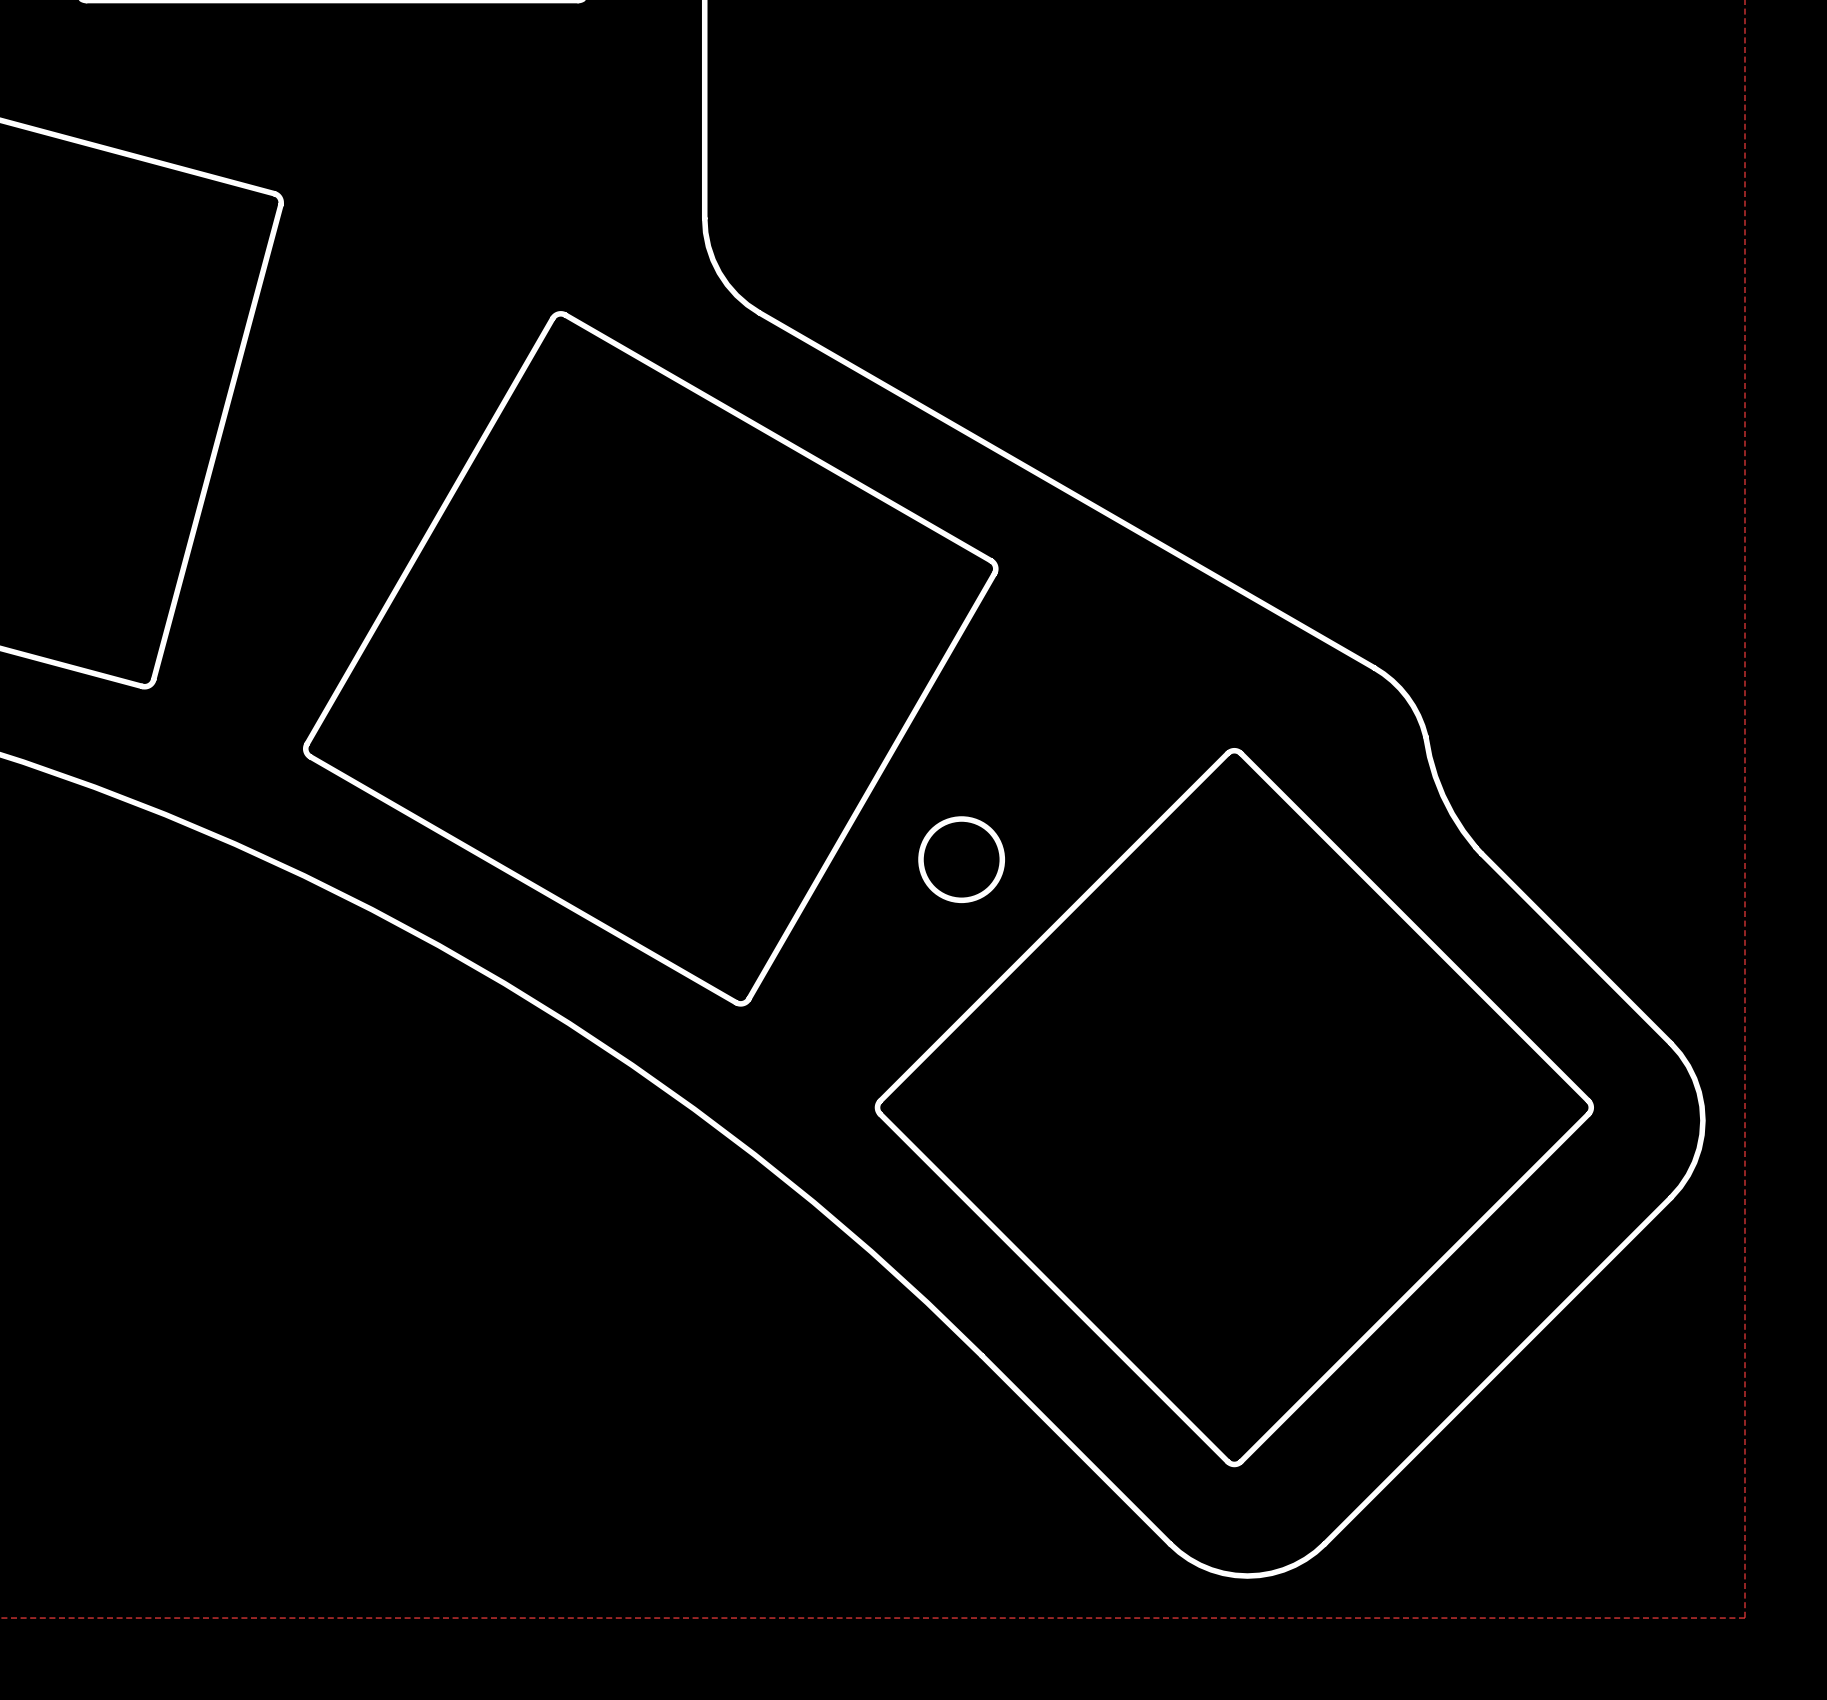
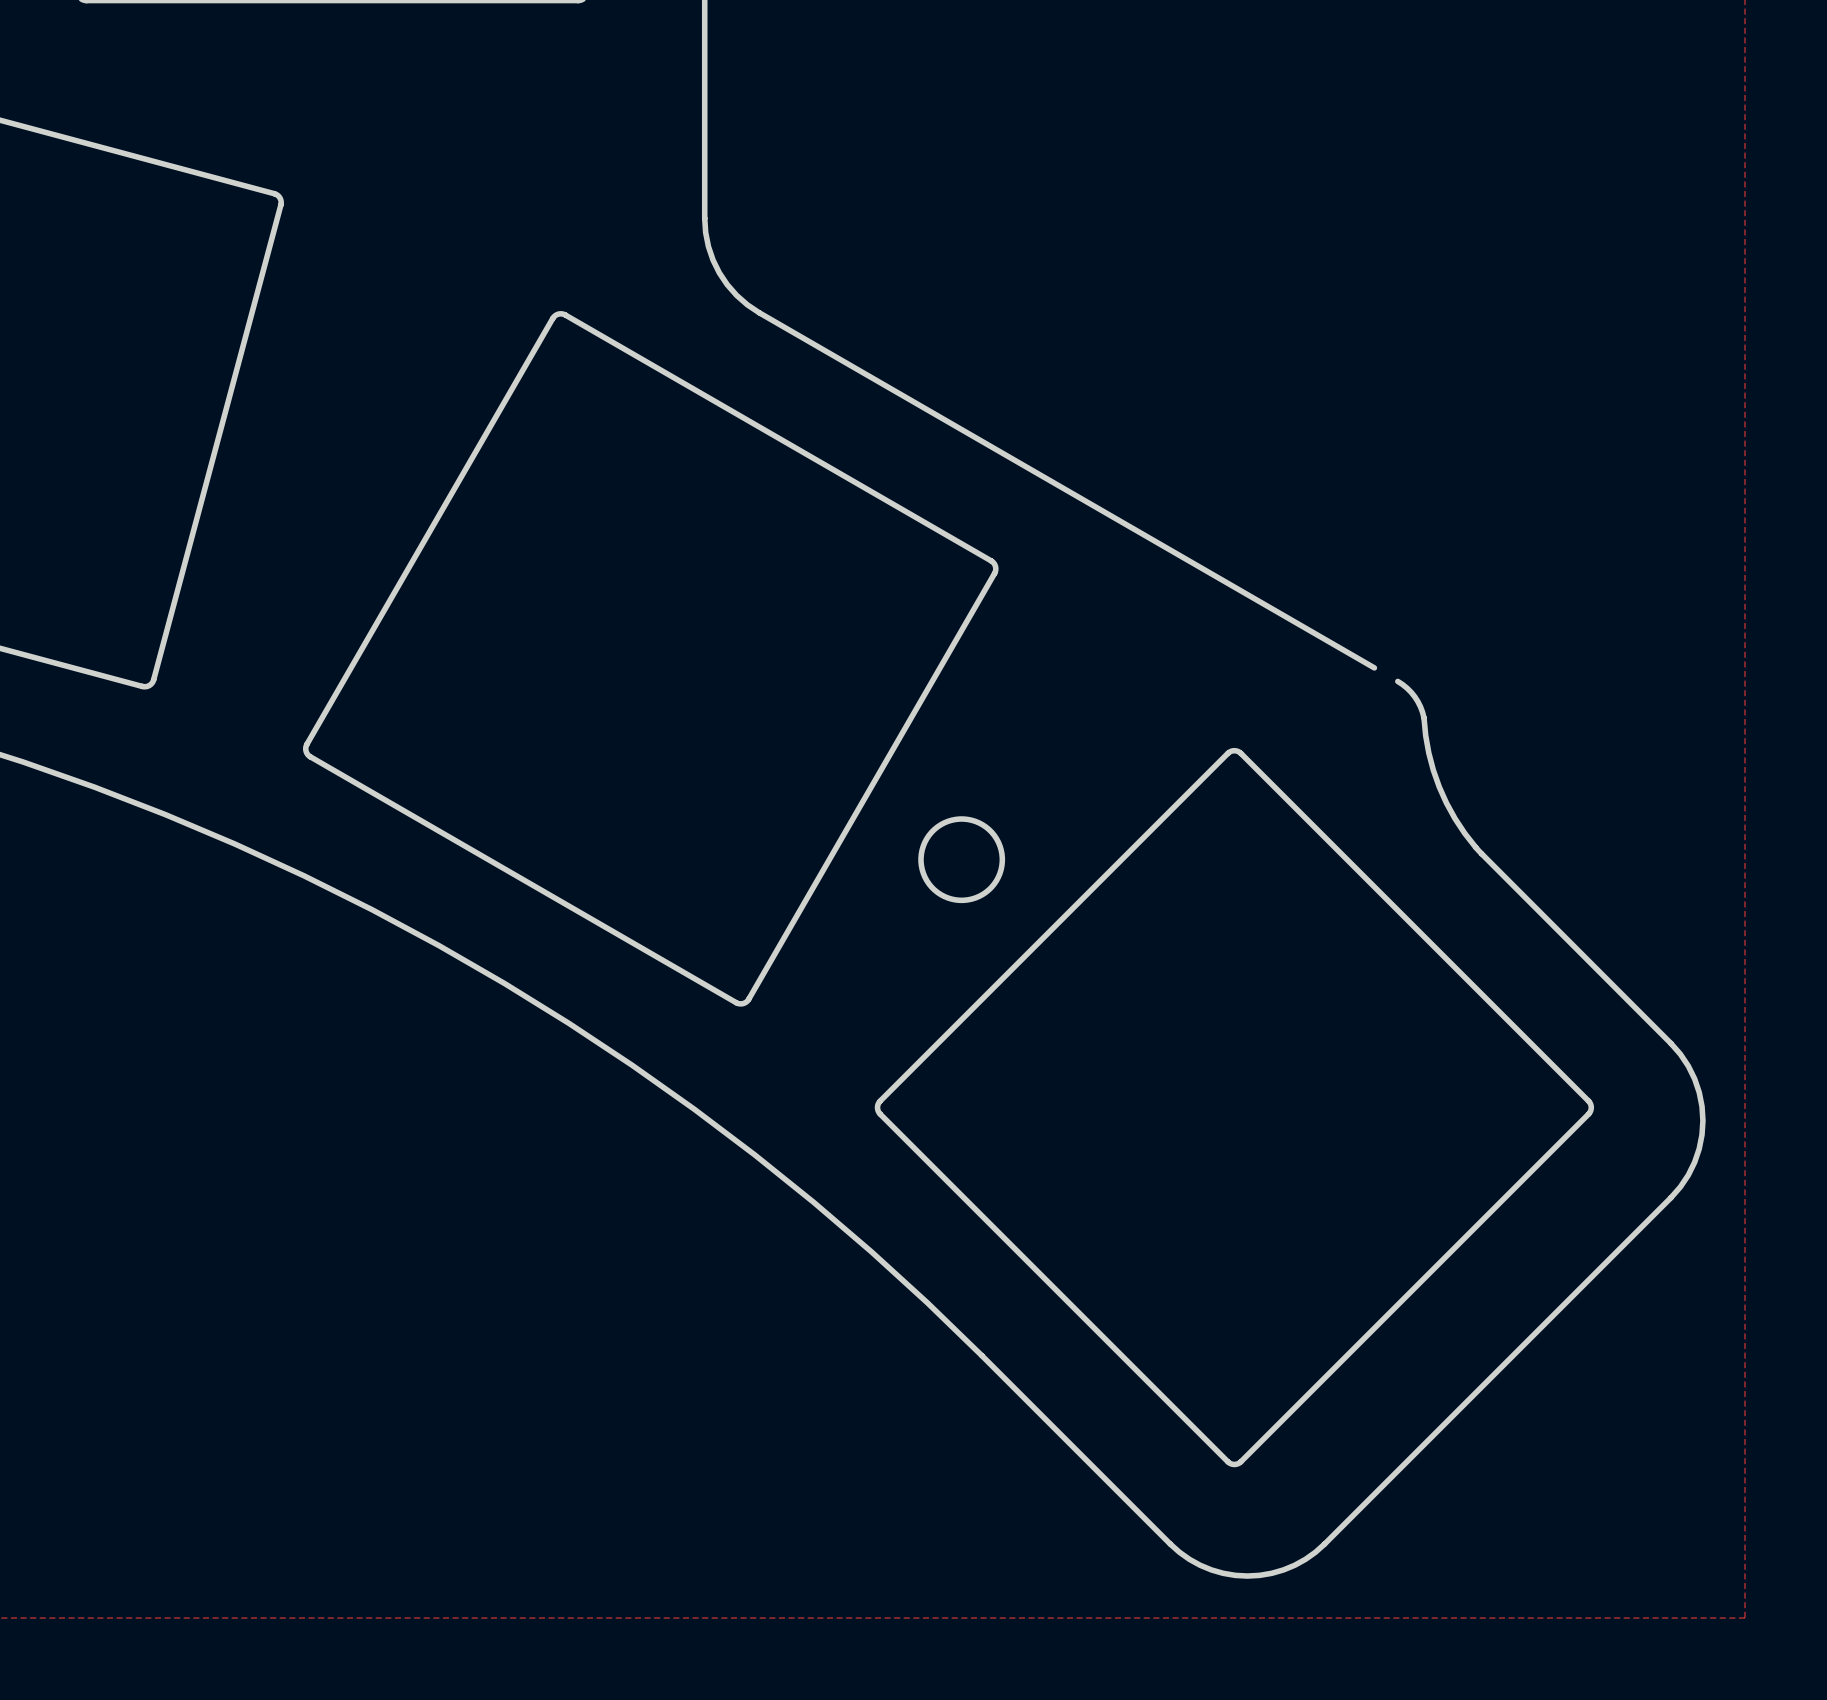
board edge: (1374, 667) (1400, 688) (1413, 706) (1422, 726) (1435, 776) (1442, 795) (1452, 813) (1475, 847) -> (1397, 681) (1411, 692) (1420, 706) (1428, 753) (1439, 786) (1455, 818) (1475, 847)

